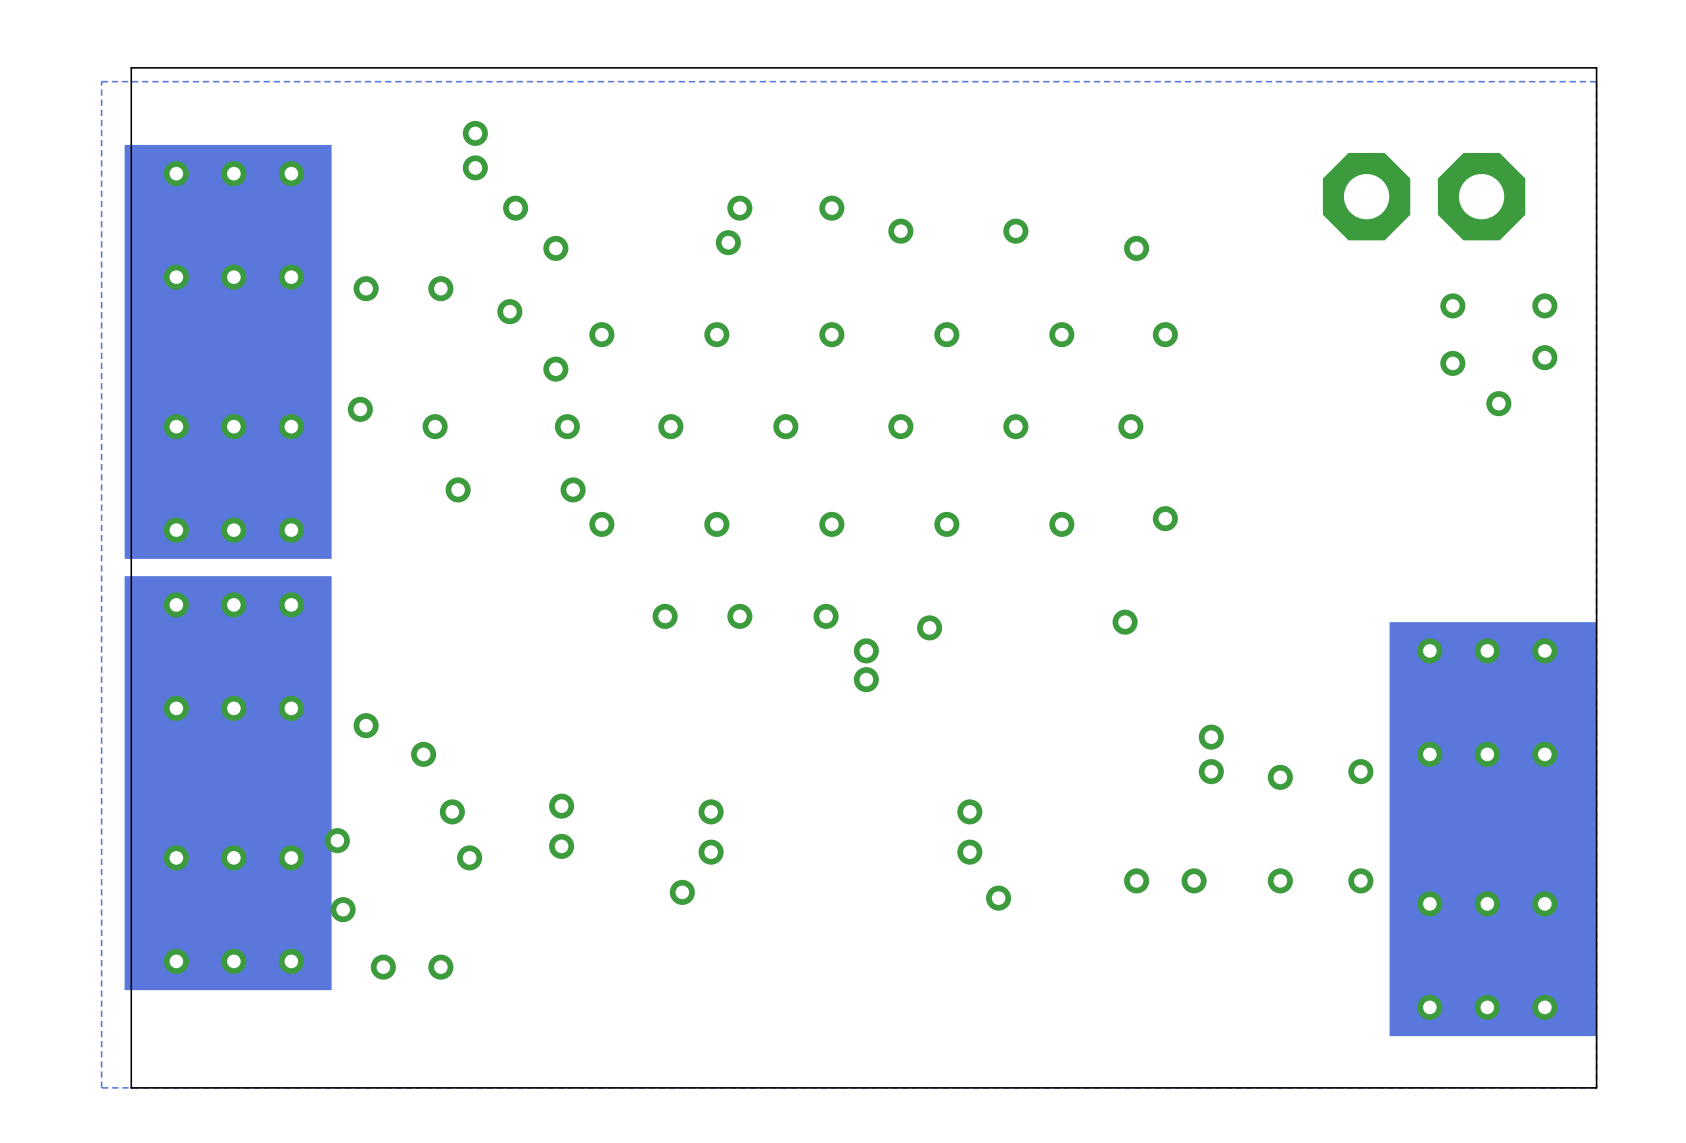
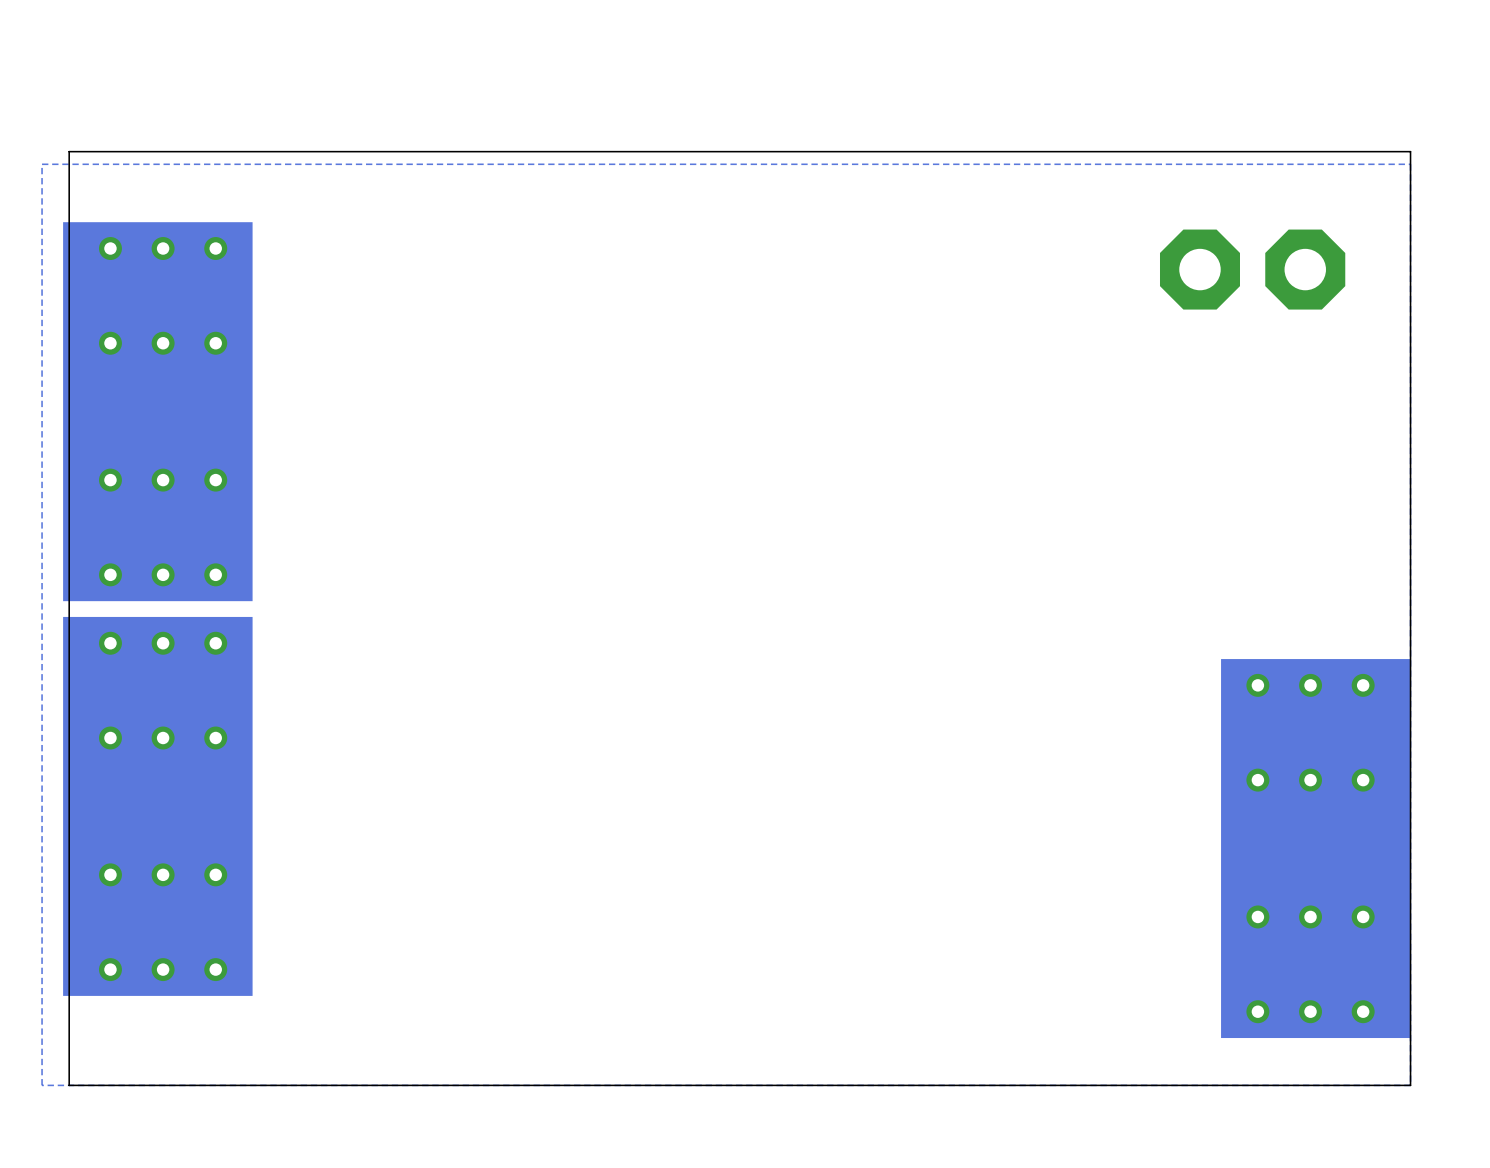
via: (475, 133) -> none
via: (475, 167) -> none
via: (515, 208) -> none
via: (739, 208) -> none
via: (831, 208) -> none
via: (900, 231) -> none
via: (1015, 231) -> none
via: (728, 242) -> none
via: (555, 248) -> none
via: (1136, 248) -> none
via: (366, 288) -> none
via: (440, 288) -> none
via: (1452, 305) -> none
via: (1544, 305) -> none
via: (509, 311) -> none
via: (601, 334) -> none
via: (716, 334) -> none
via: (831, 334) -> none
via: (946, 334) -> none
via: (1061, 334) -> none
via: (1165, 334) -> none
via: (1544, 357) -> none
via: (1452, 363) -> none
via: (555, 369) -> none
via: (1498, 403) -> none
via: (360, 409) -> none
via: (435, 426) -> none
via: (567, 426) -> none
via: (670, 426) -> none
via: (785, 426) -> none
via: (900, 426) -> none
via: (1015, 426) -> none
via: (1130, 426) -> none
via: (458, 489) -> none
via: (573, 489) -> none
via: (1165, 518) -> none
via: (601, 524) -> none
via: (716, 524) -> none
via: (831, 524) -> none
via: (946, 524) -> none
via: (1061, 524) -> none
via: (665, 616) -> none
via: (739, 616) -> none
via: (826, 616) -> none
via: (1125, 622) -> none
via: (929, 627) -> none
via: (866, 650) -> none
via: (866, 679) -> none
via: (366, 725) -> none
via: (1211, 737) -> none
via: (423, 754) -> none
via: (1211, 771) -> none
via: (1360, 771) -> none
via: (1280, 777) -> none
via: (561, 806) -> none
via: (452, 811) -> none
via: (711, 811) -> none
via: (969, 811) -> none
via: (337, 840) -> none
via: (561, 846) -> none
via: (711, 852) -> none
via: (969, 852) -> none
via: (469, 857) -> none
via: (1136, 880) -> none
via: (1194, 880) -> none
via: (1280, 880) -> none
via: (1360, 880) -> none
via: (682, 892) -> none
via: (998, 898) -> none
via: (343, 909) -> none
via: (383, 967) -> none
via: (440, 967) -> none

